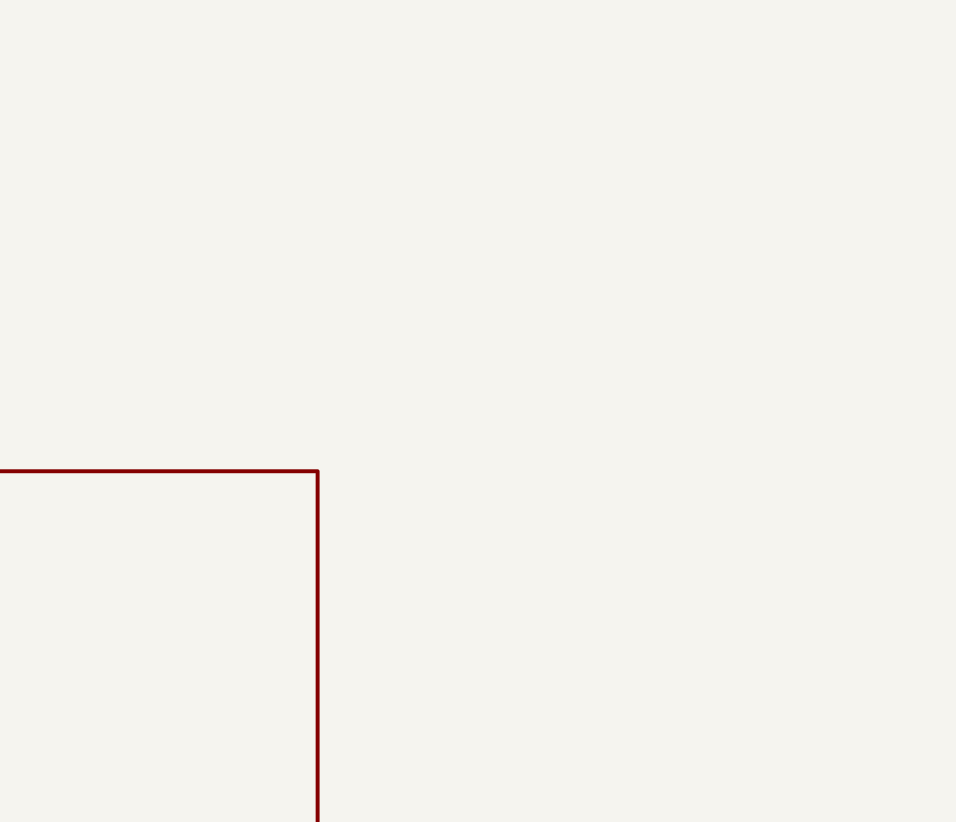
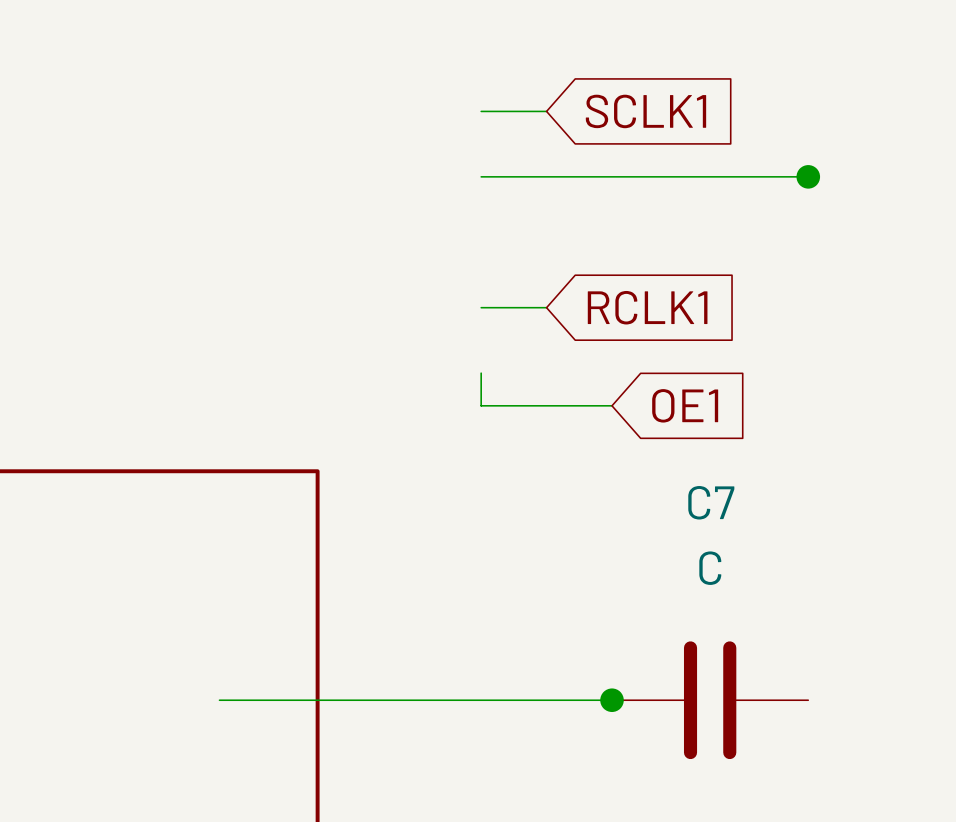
wire: none -> (481, 111) (546, 111)
global label: none -> SCLK1 (645, 111)
wire: none -> (481, 176) (808, 176)
junction: none -> (808, 176)
wire: none -> (481, 307) (546, 307)
global label: none -> RCLK1 (647, 307)
wire: none -> (481, 373) (481, 405) (612, 405)
global label: none -> OE1 (685, 405)
wire: none -> (219, 700) (612, 700)
junction: none -> (612, 700)
C7: none -> C (710, 700)

